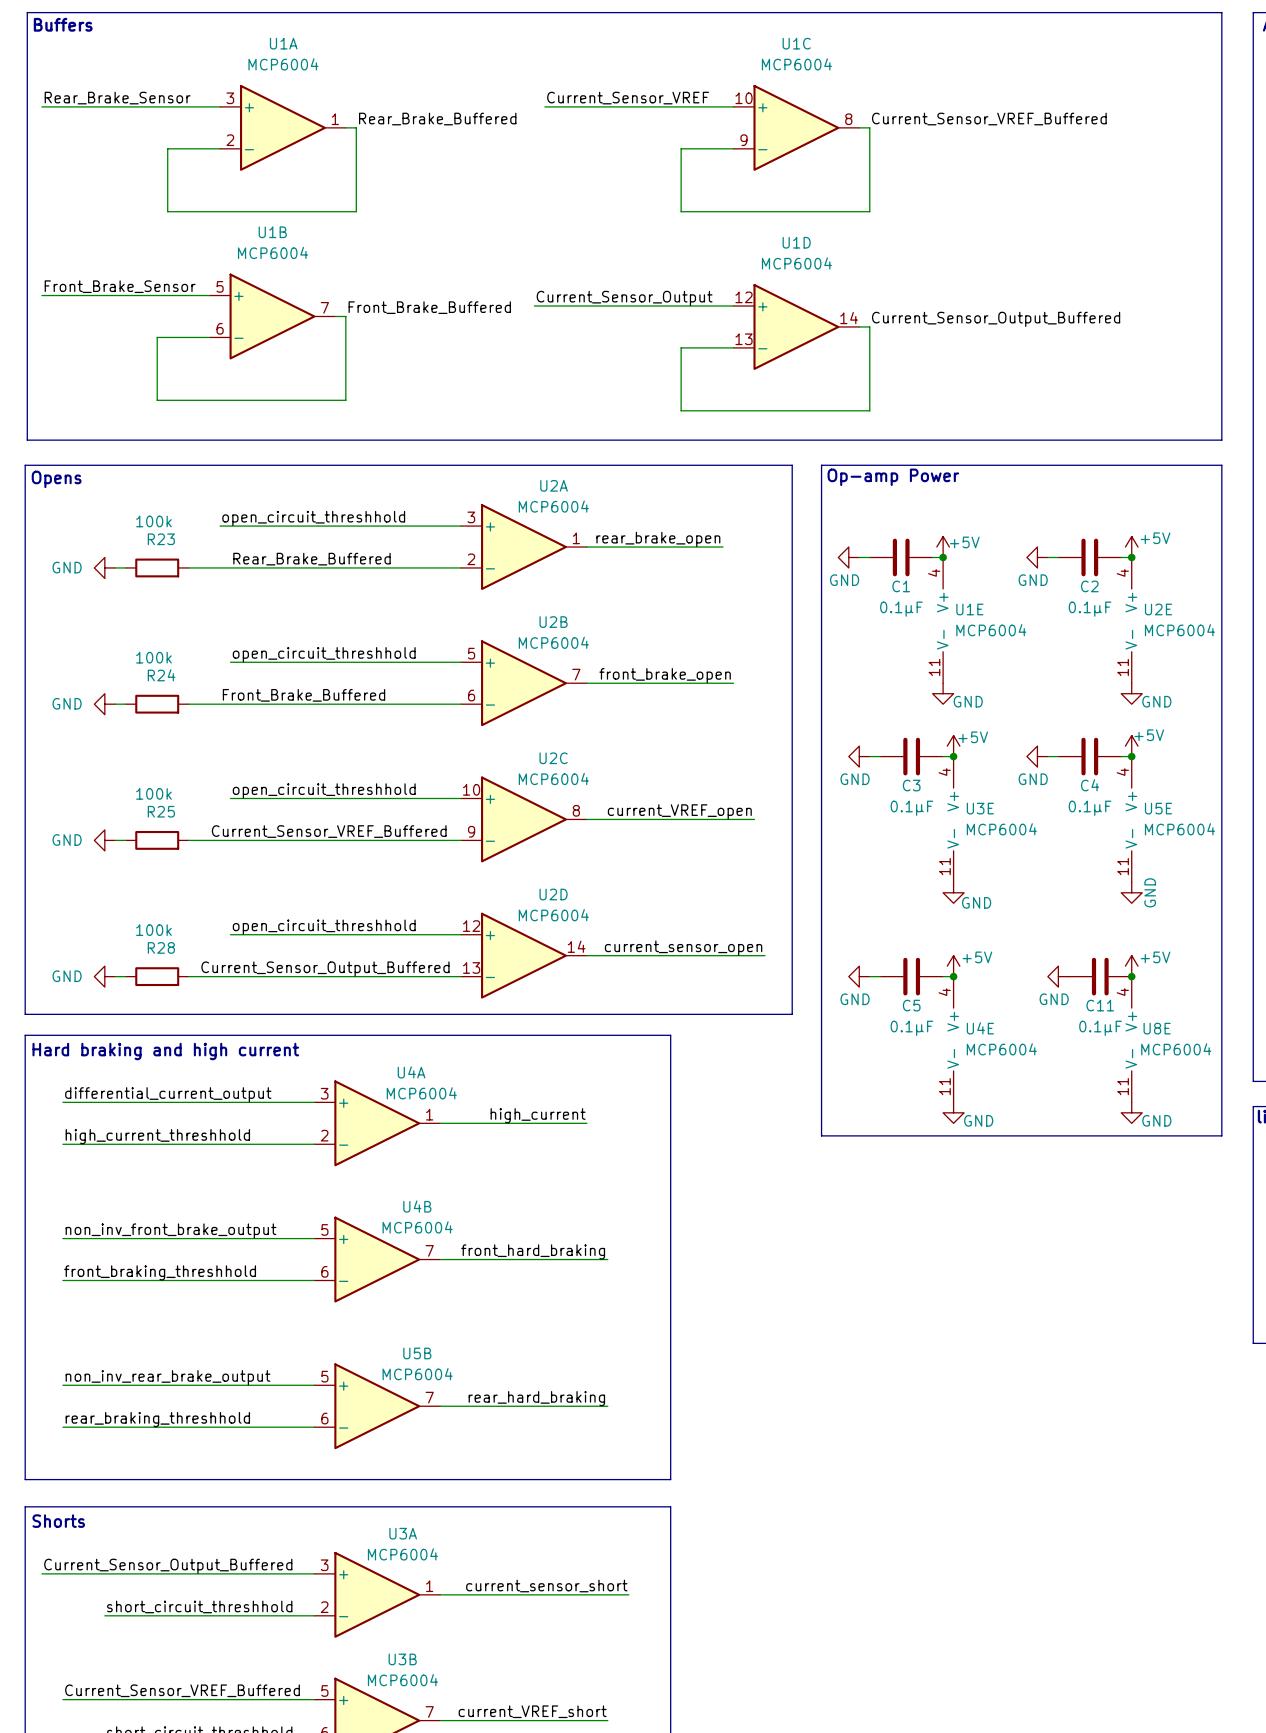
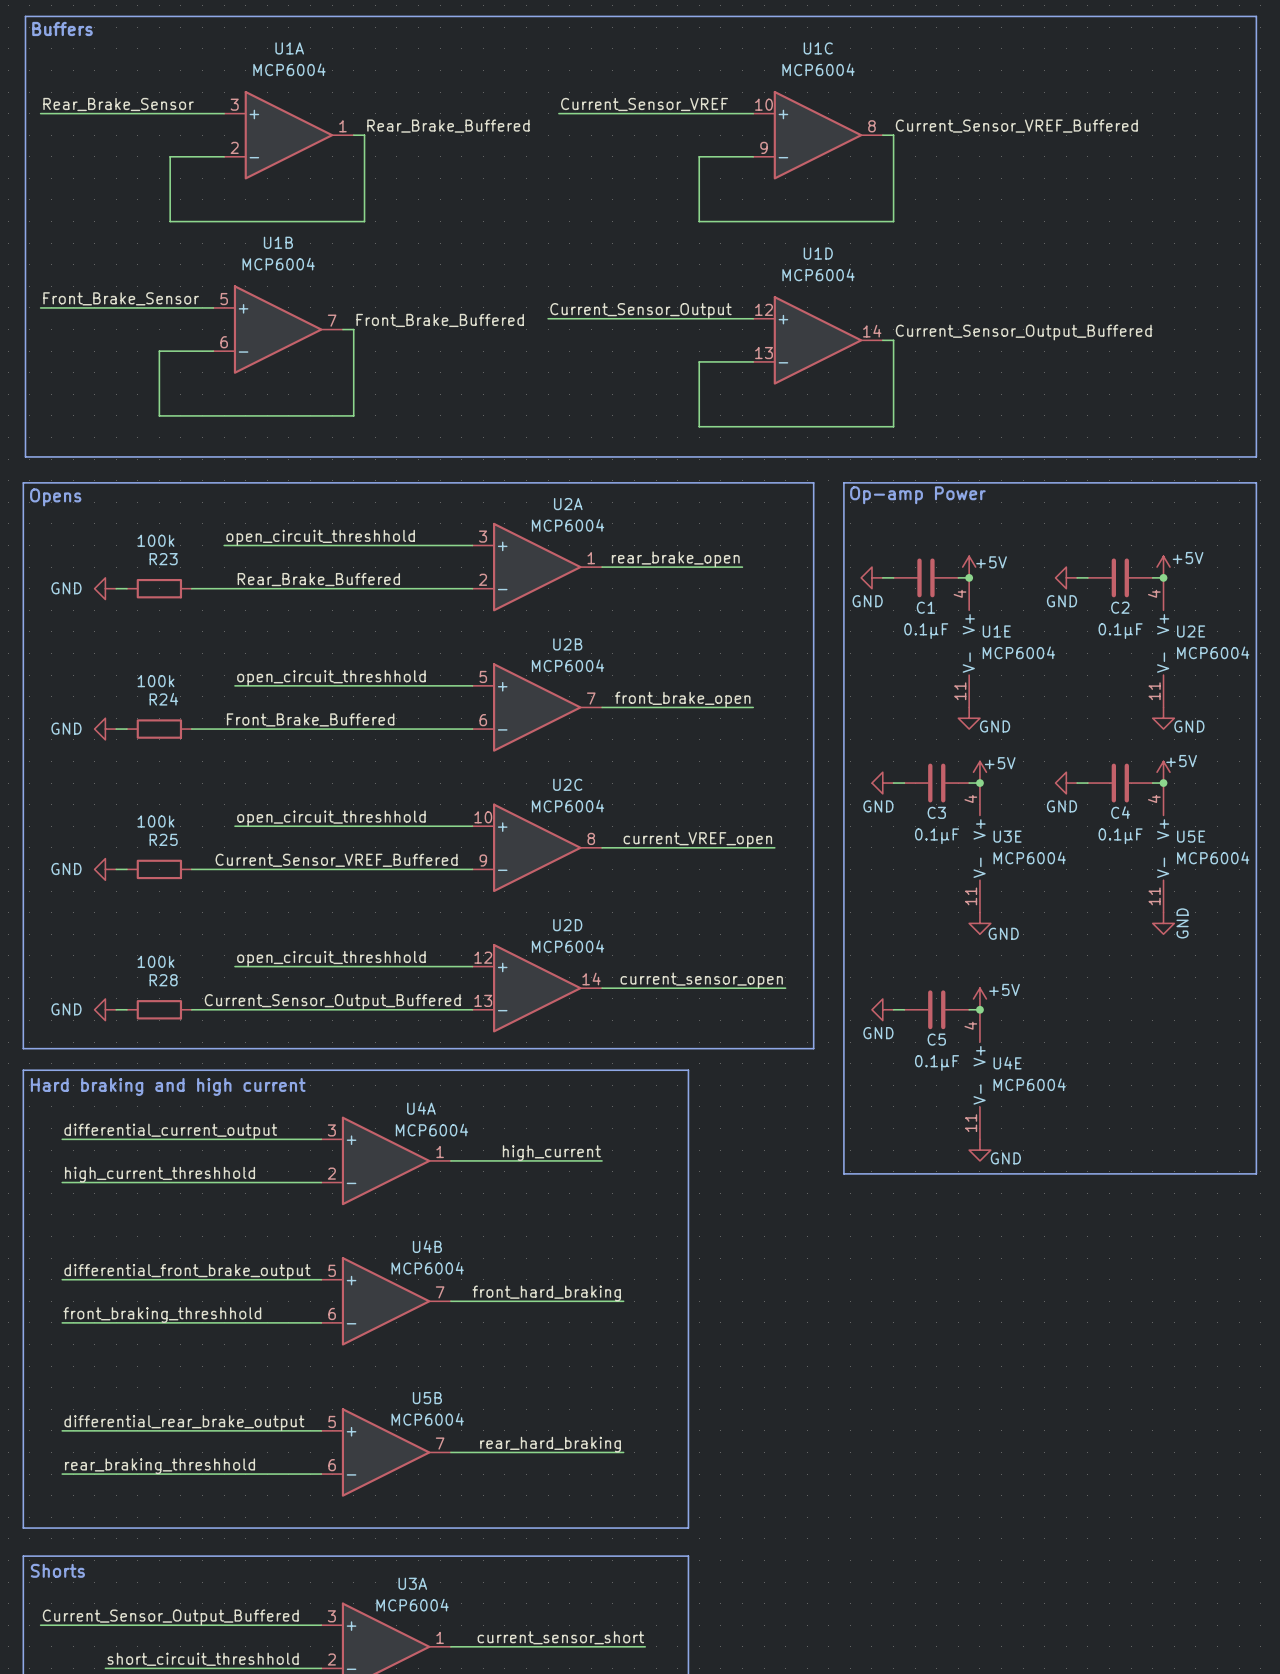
power symbol: +5V (1131, 966) -> none
power symbol: GND (1058, 976) -> none
C11: 0.1μF (1100, 976) -> none
junction: (1131, 976) -> none
U8E: MCP6004 (1131, 1039) -> none
power symbol: GND (1131, 1112) -> none
label: non_inv_front_brake_output (171, 1230) -> differential_front_brake_output (187, 1271)
label: non_inv_rear_brake_output (168, 1377) -> differential_rear_brake_output (184, 1423)

